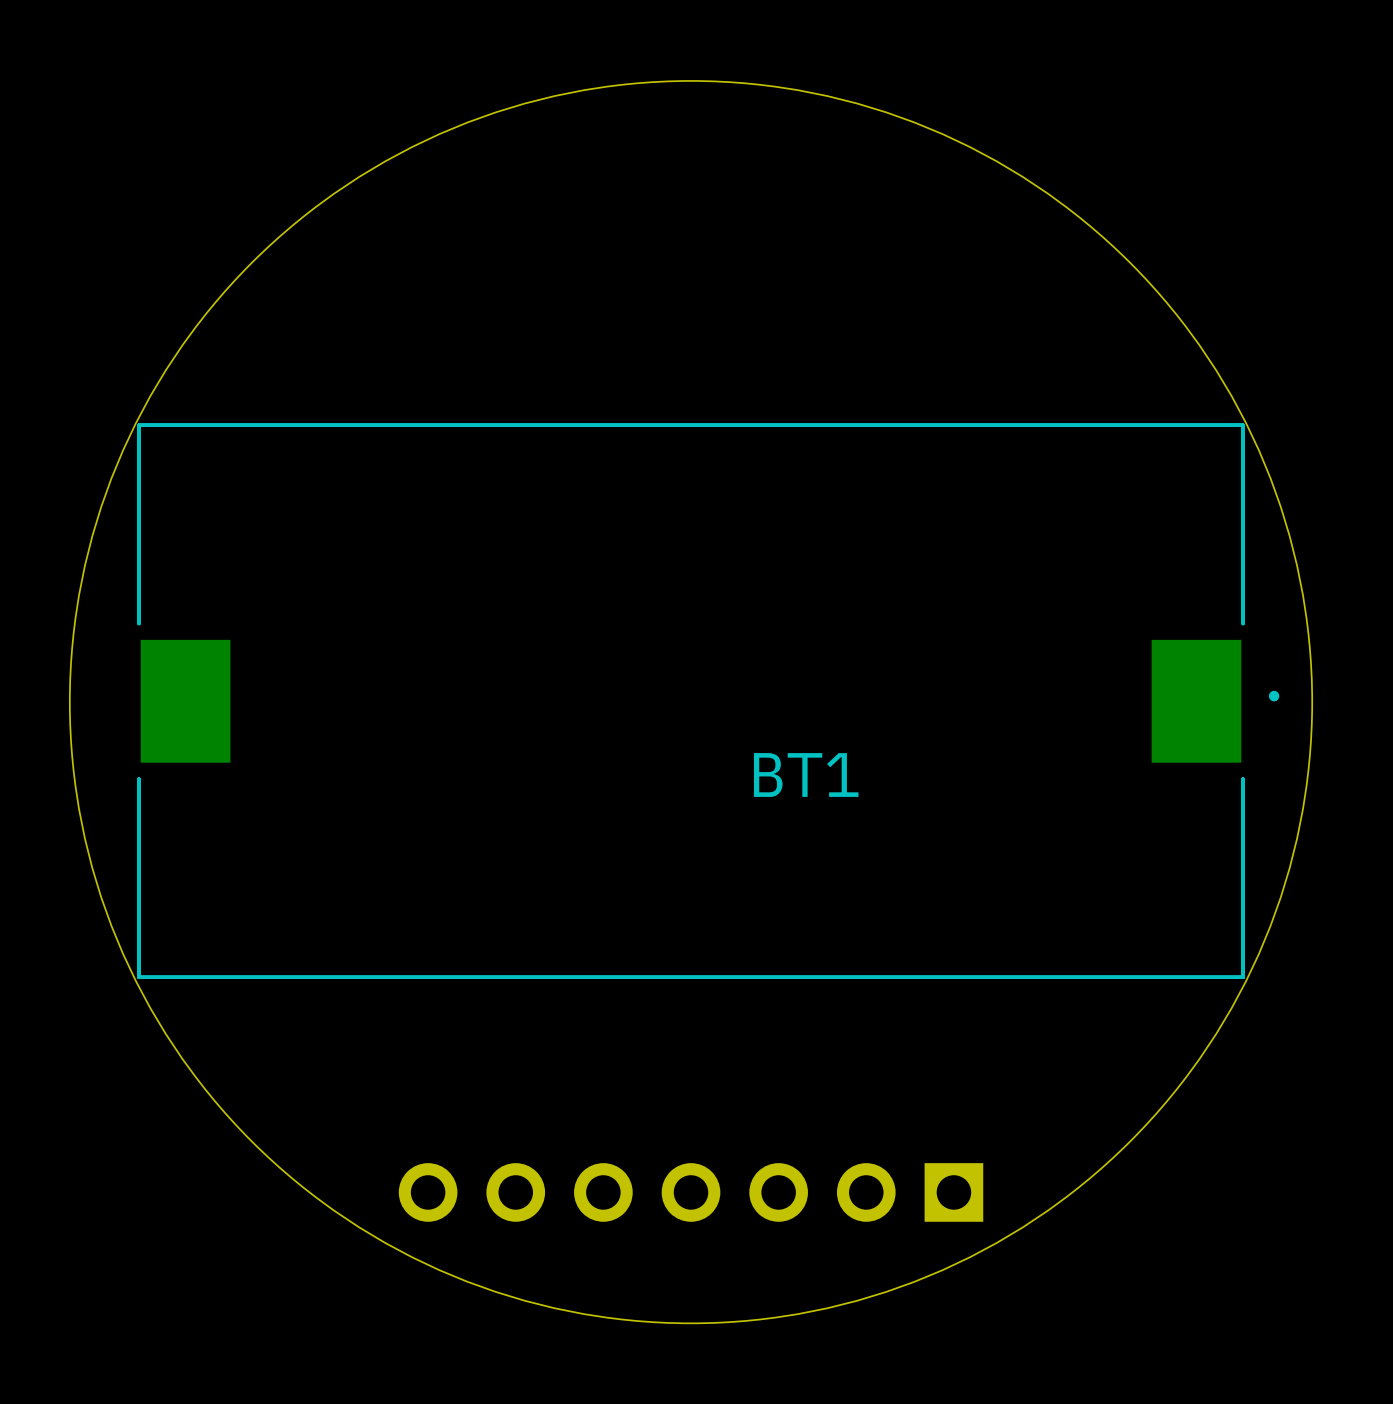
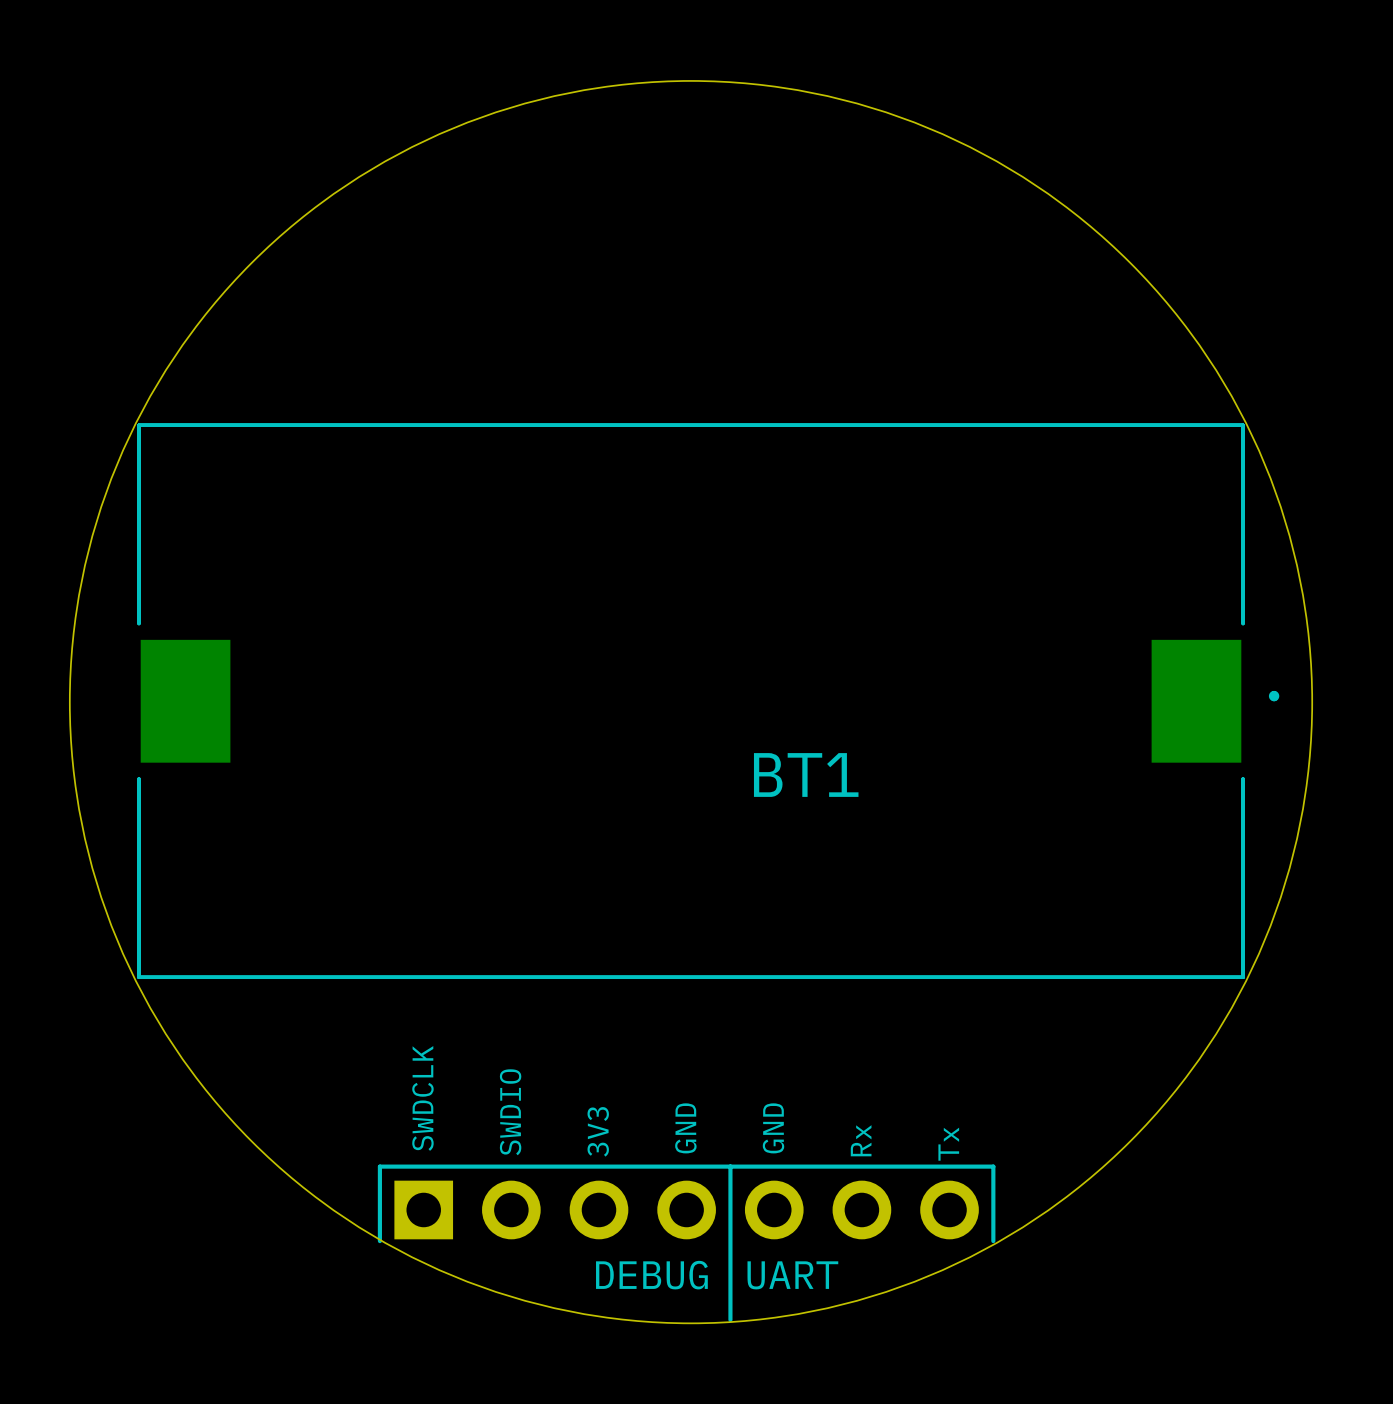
text: none -> SWDCLK (422, 1098)
text: none -> SWDIO (510, 1112)
text: none -> GND (685, 1128)
text: none -> GND (773, 1128)
text: none -> 3V3 (598, 1131)
text: none -> Rx (861, 1140)
text: none -> Tx (948, 1144)
line: none -> (730, 1166) (730, 1319)
part side: top (691, 1192) -> bottom (686, 1209)
line: none -> (993, 1241) (993, 1166) (379, 1166) (379, 1241)
text: none -> DEBUG (651, 1275)
text: none -> UART (792, 1275)

